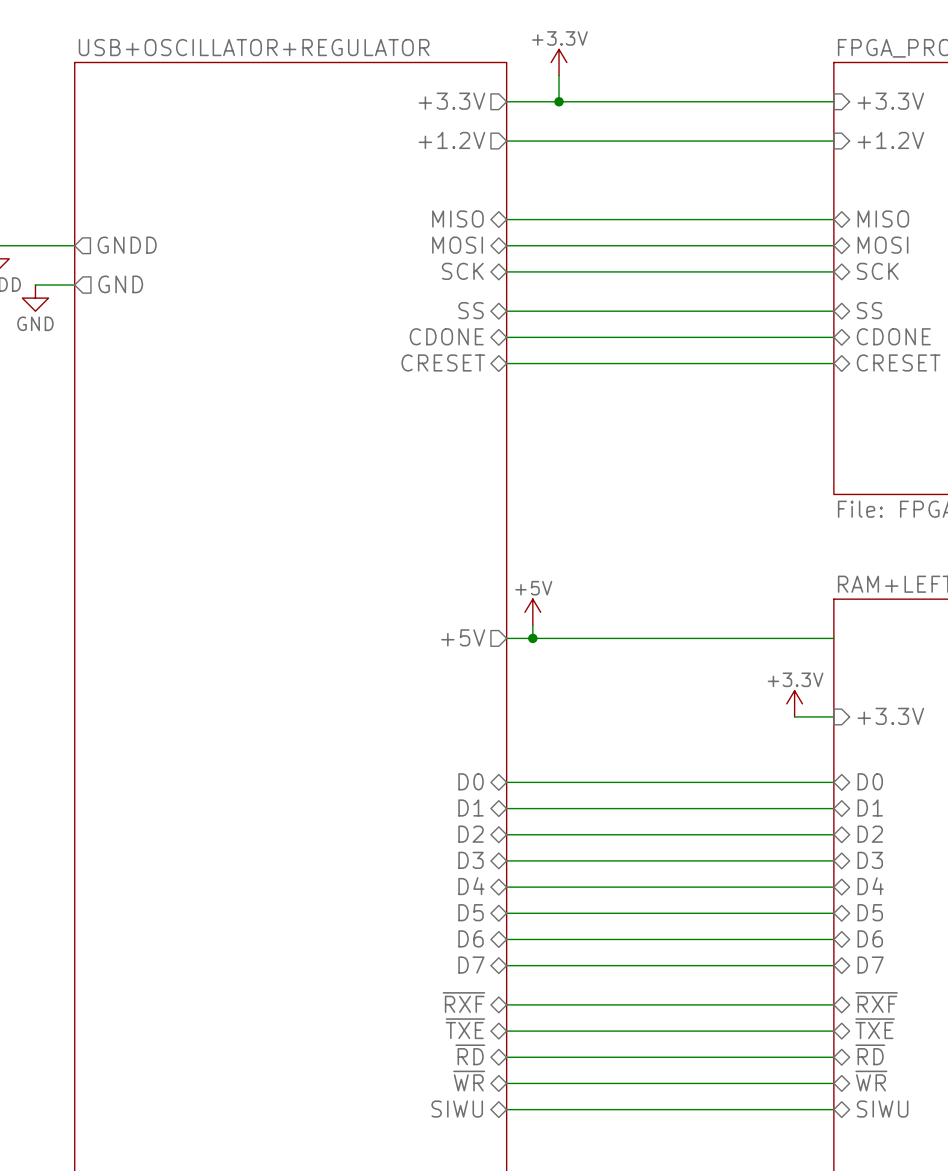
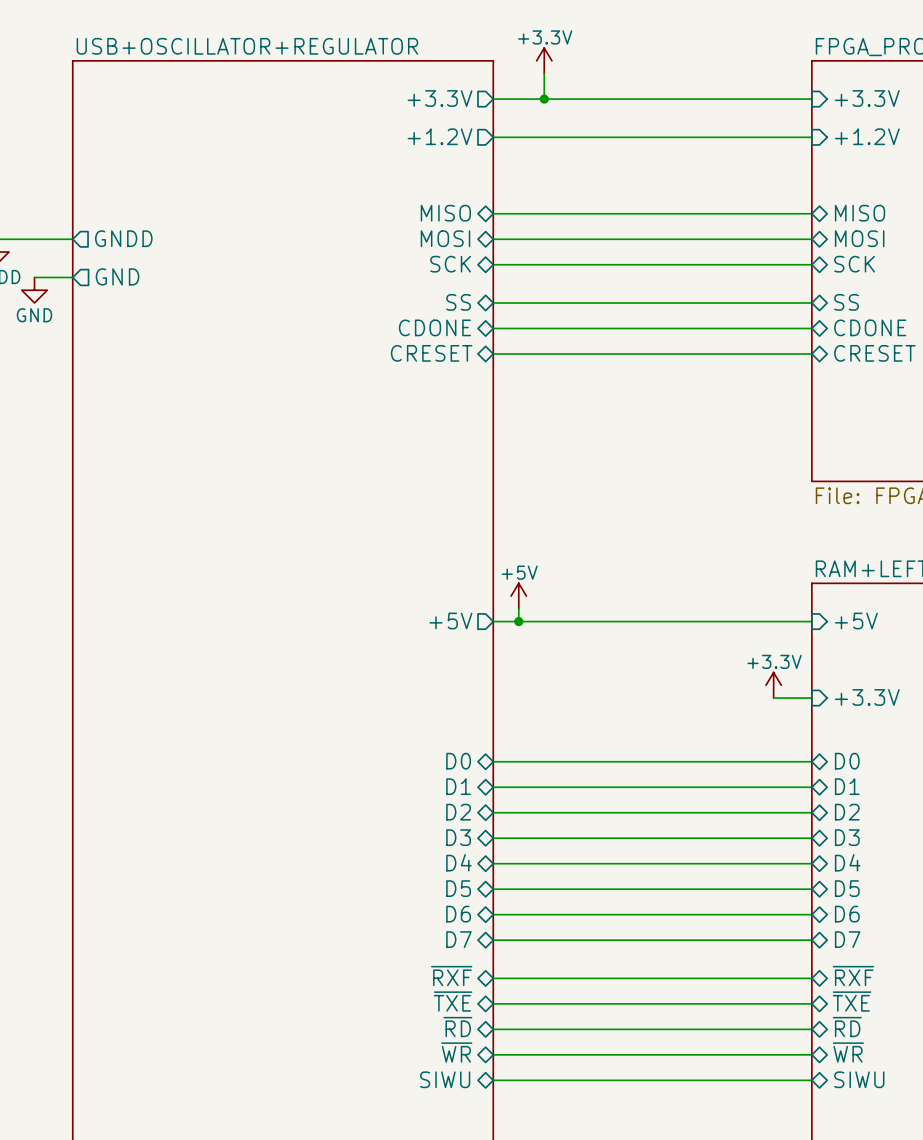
sheet pin: none -> +5V (856, 621)

